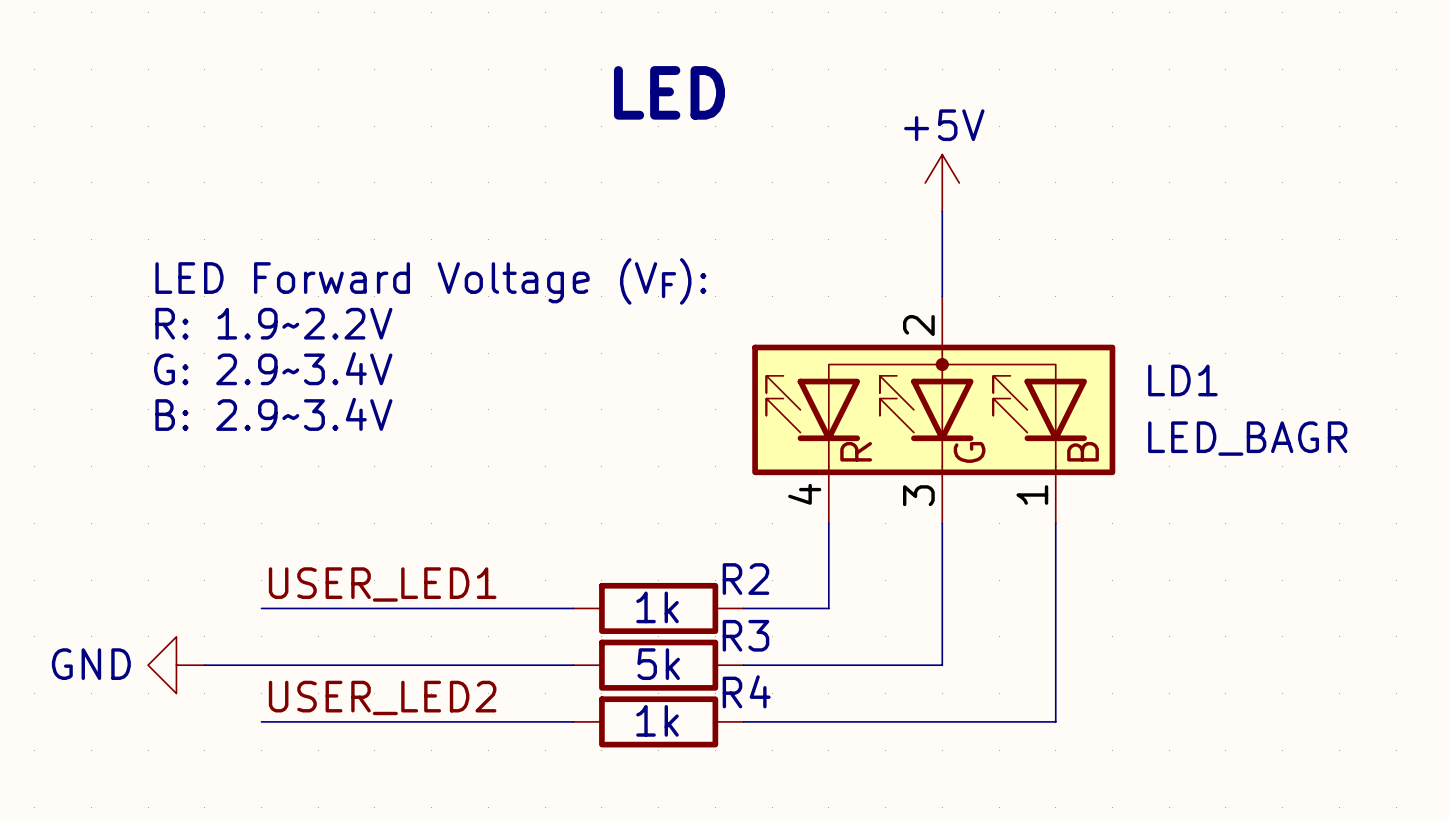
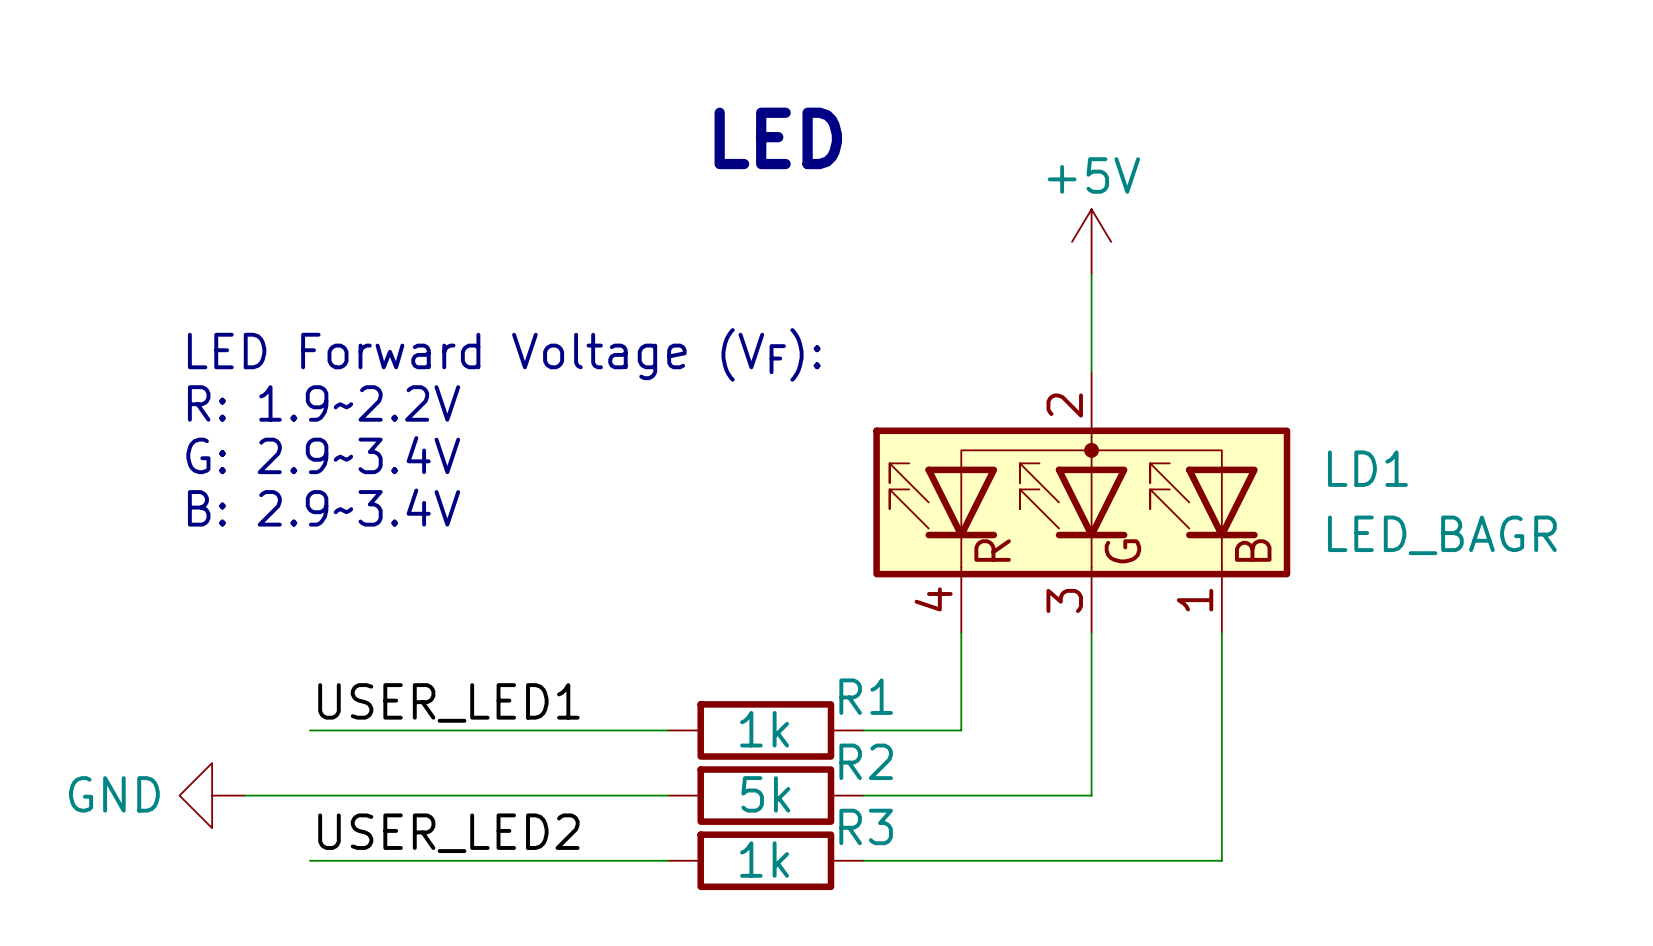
R2 name: R2 (745, 579) -> R1 (866, 696)
R3 name: R3 (745, 635) -> R2 (866, 761)
R4 name: R4 (746, 691) -> R3 (866, 826)

